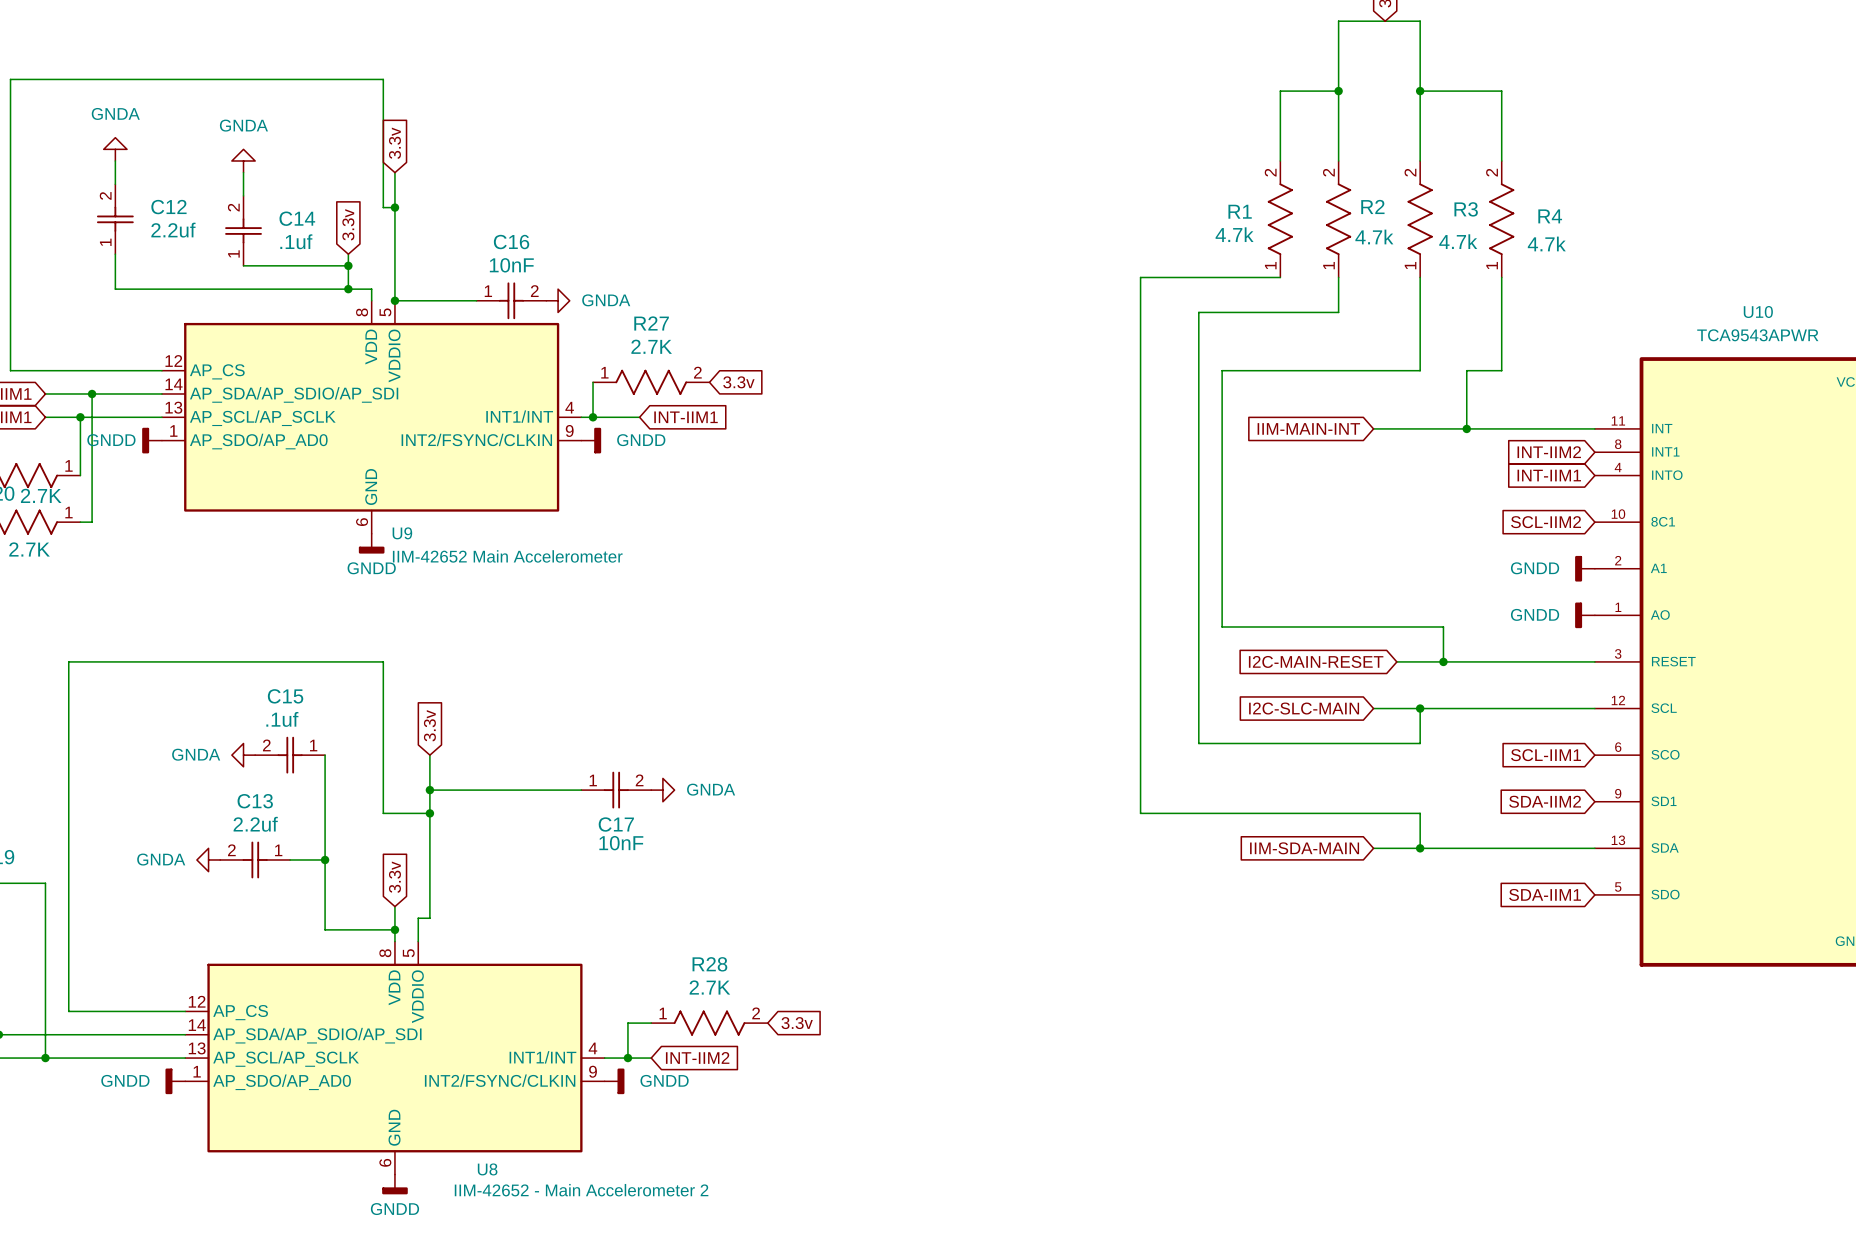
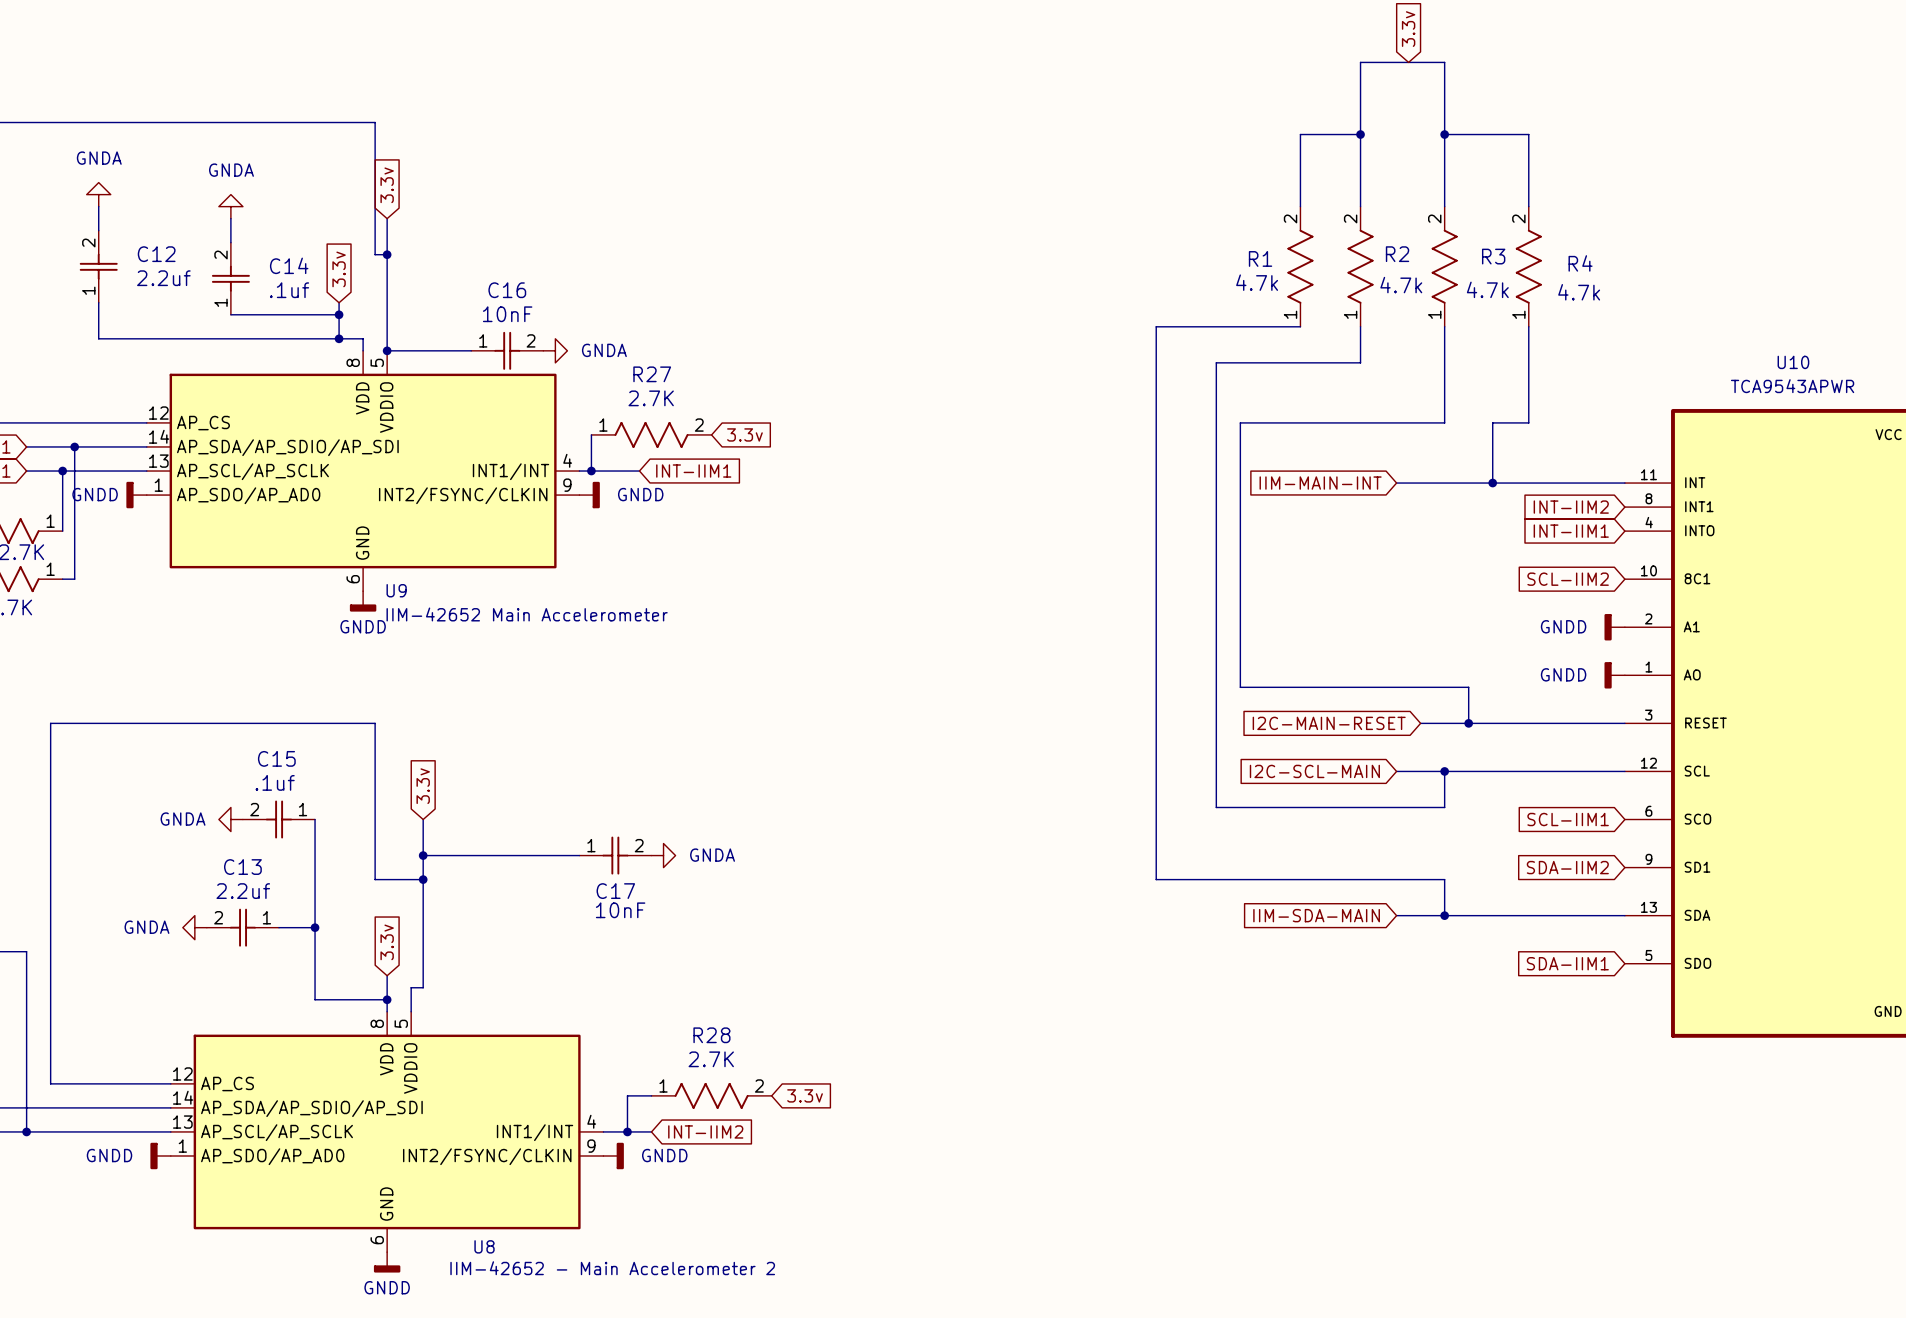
global label: I2C-SLC-MAIN (1304, 708) -> I2C-SCL-MAIN (1314, 771)

